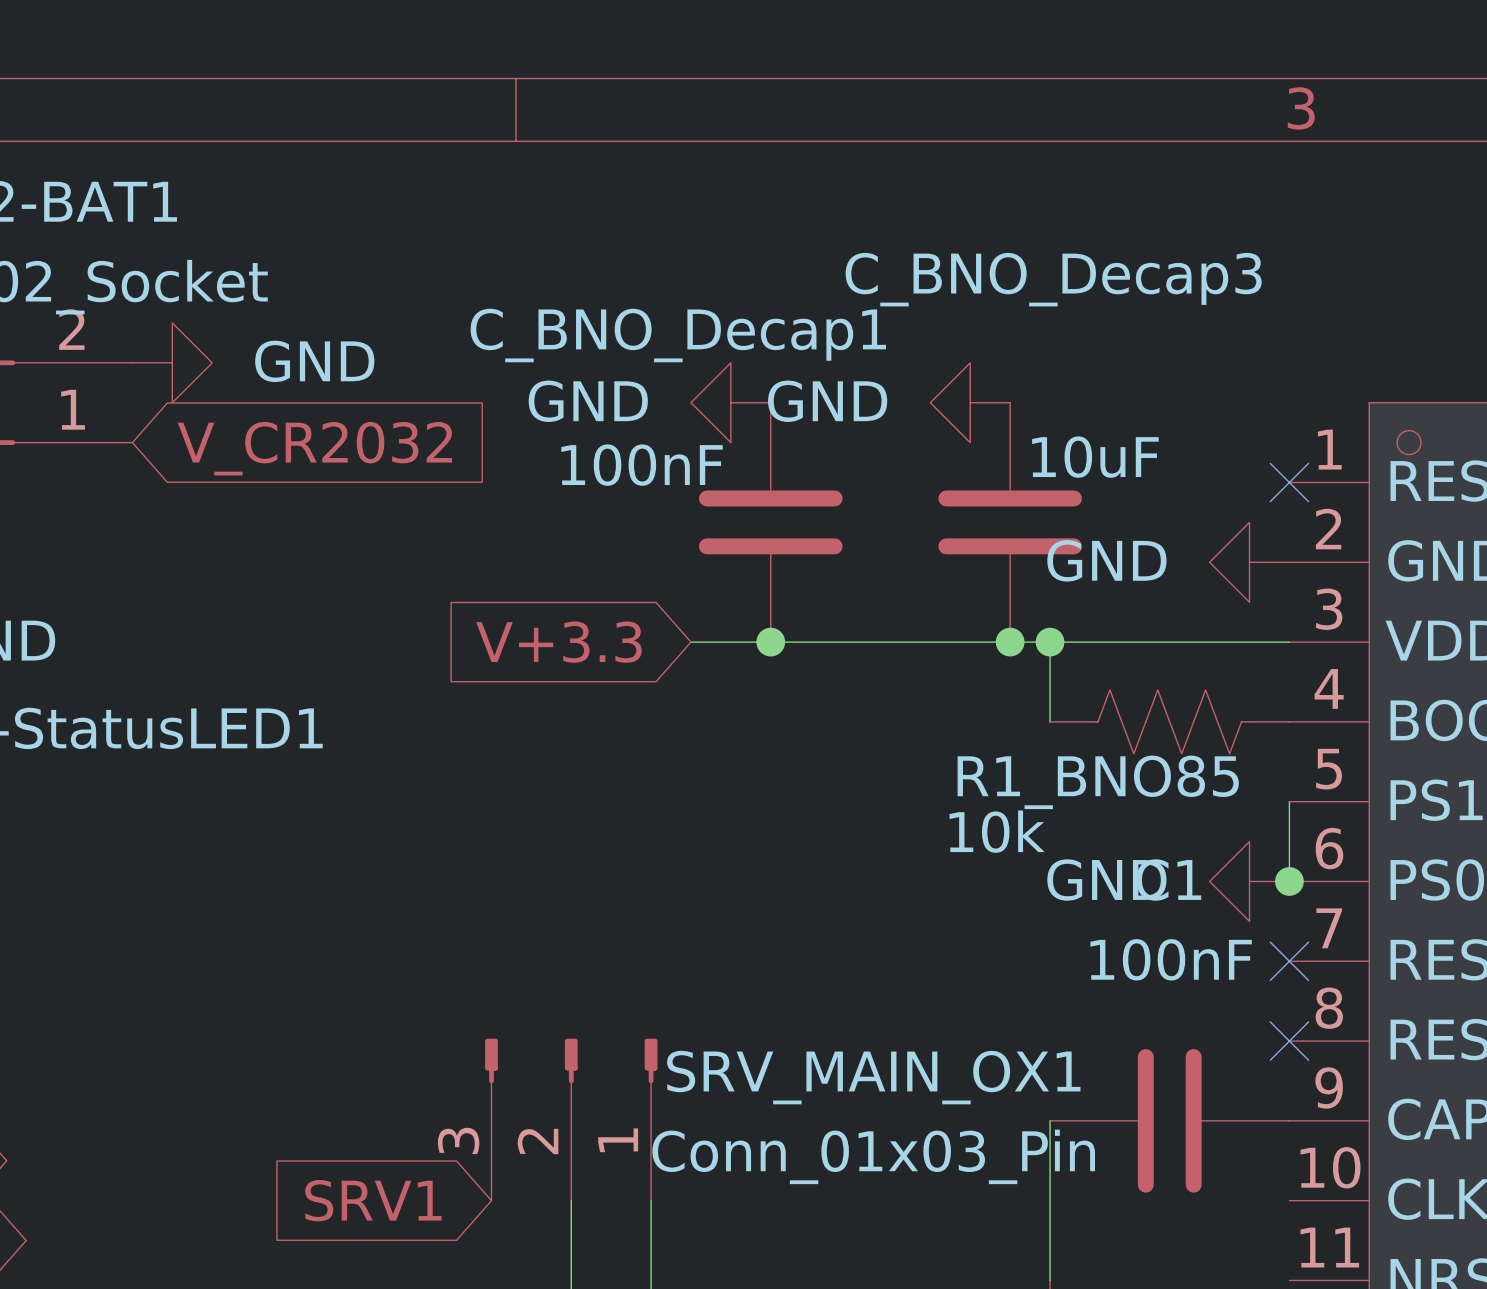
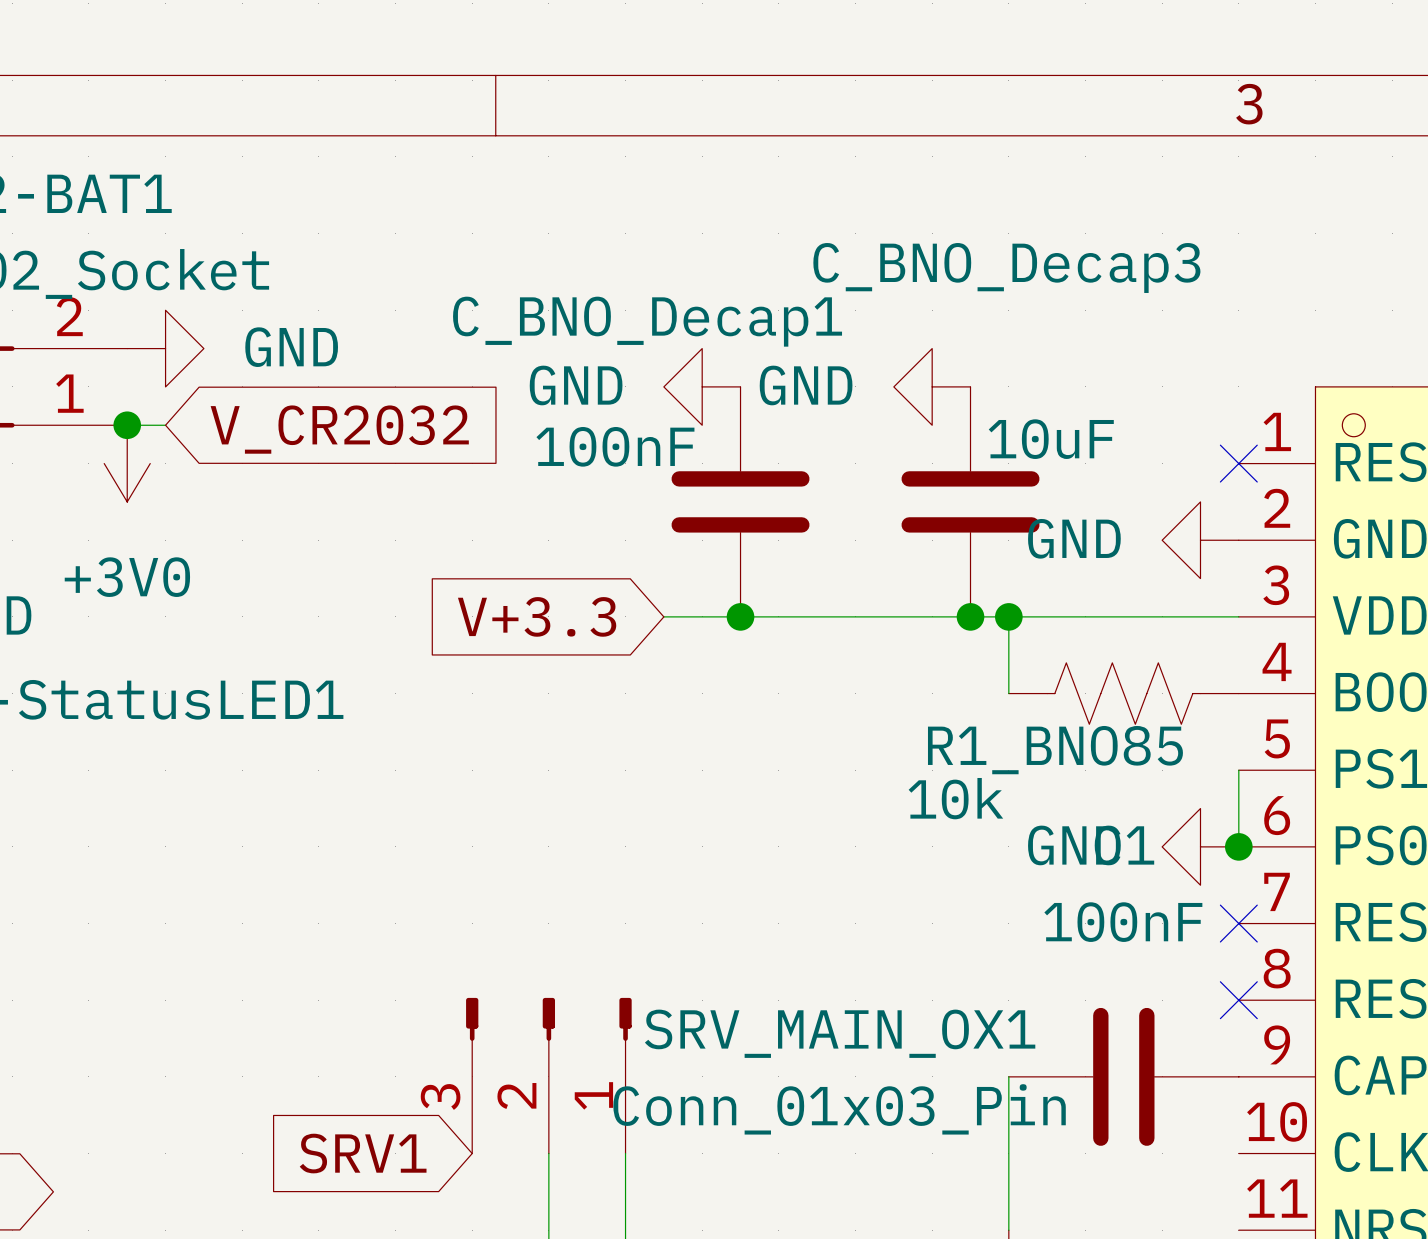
wire: none -> (127, 425) (165, 425)
junction: none -> (127, 425)
global label position: V_CR2032 (314, 448) -> V_CR2032 (339, 429)
power symbol: none -> +3V0 (127, 463)

